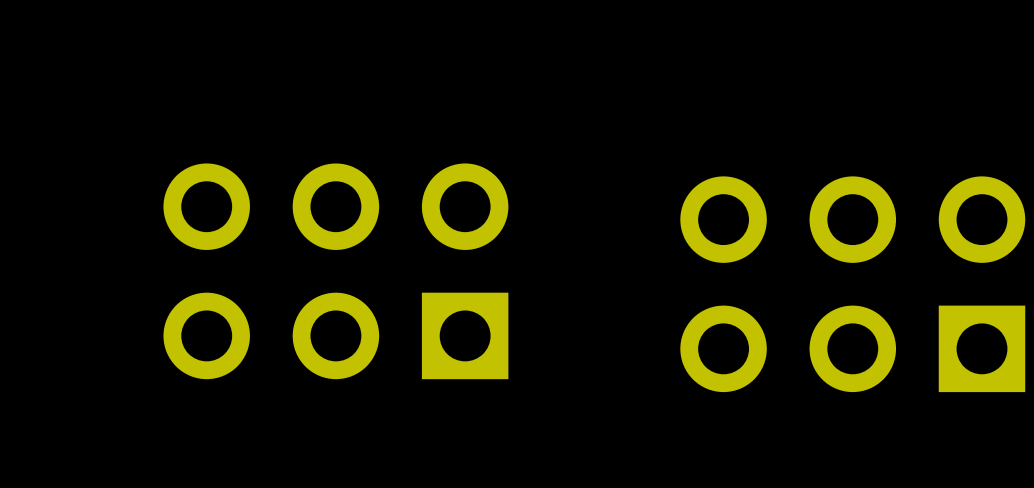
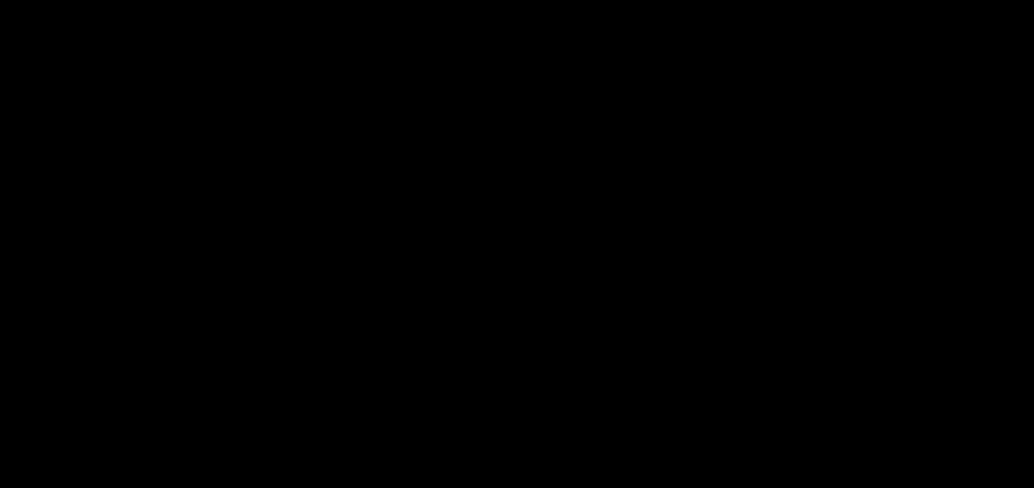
part: (335, 271) -> none
part: (852, 284) -> none

